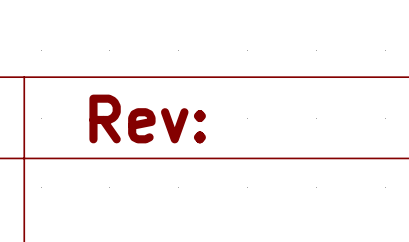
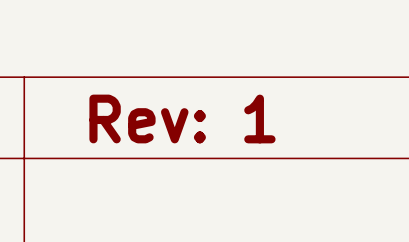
title block: Rev: (147, 118) -> Rev: 1 (182, 118)

